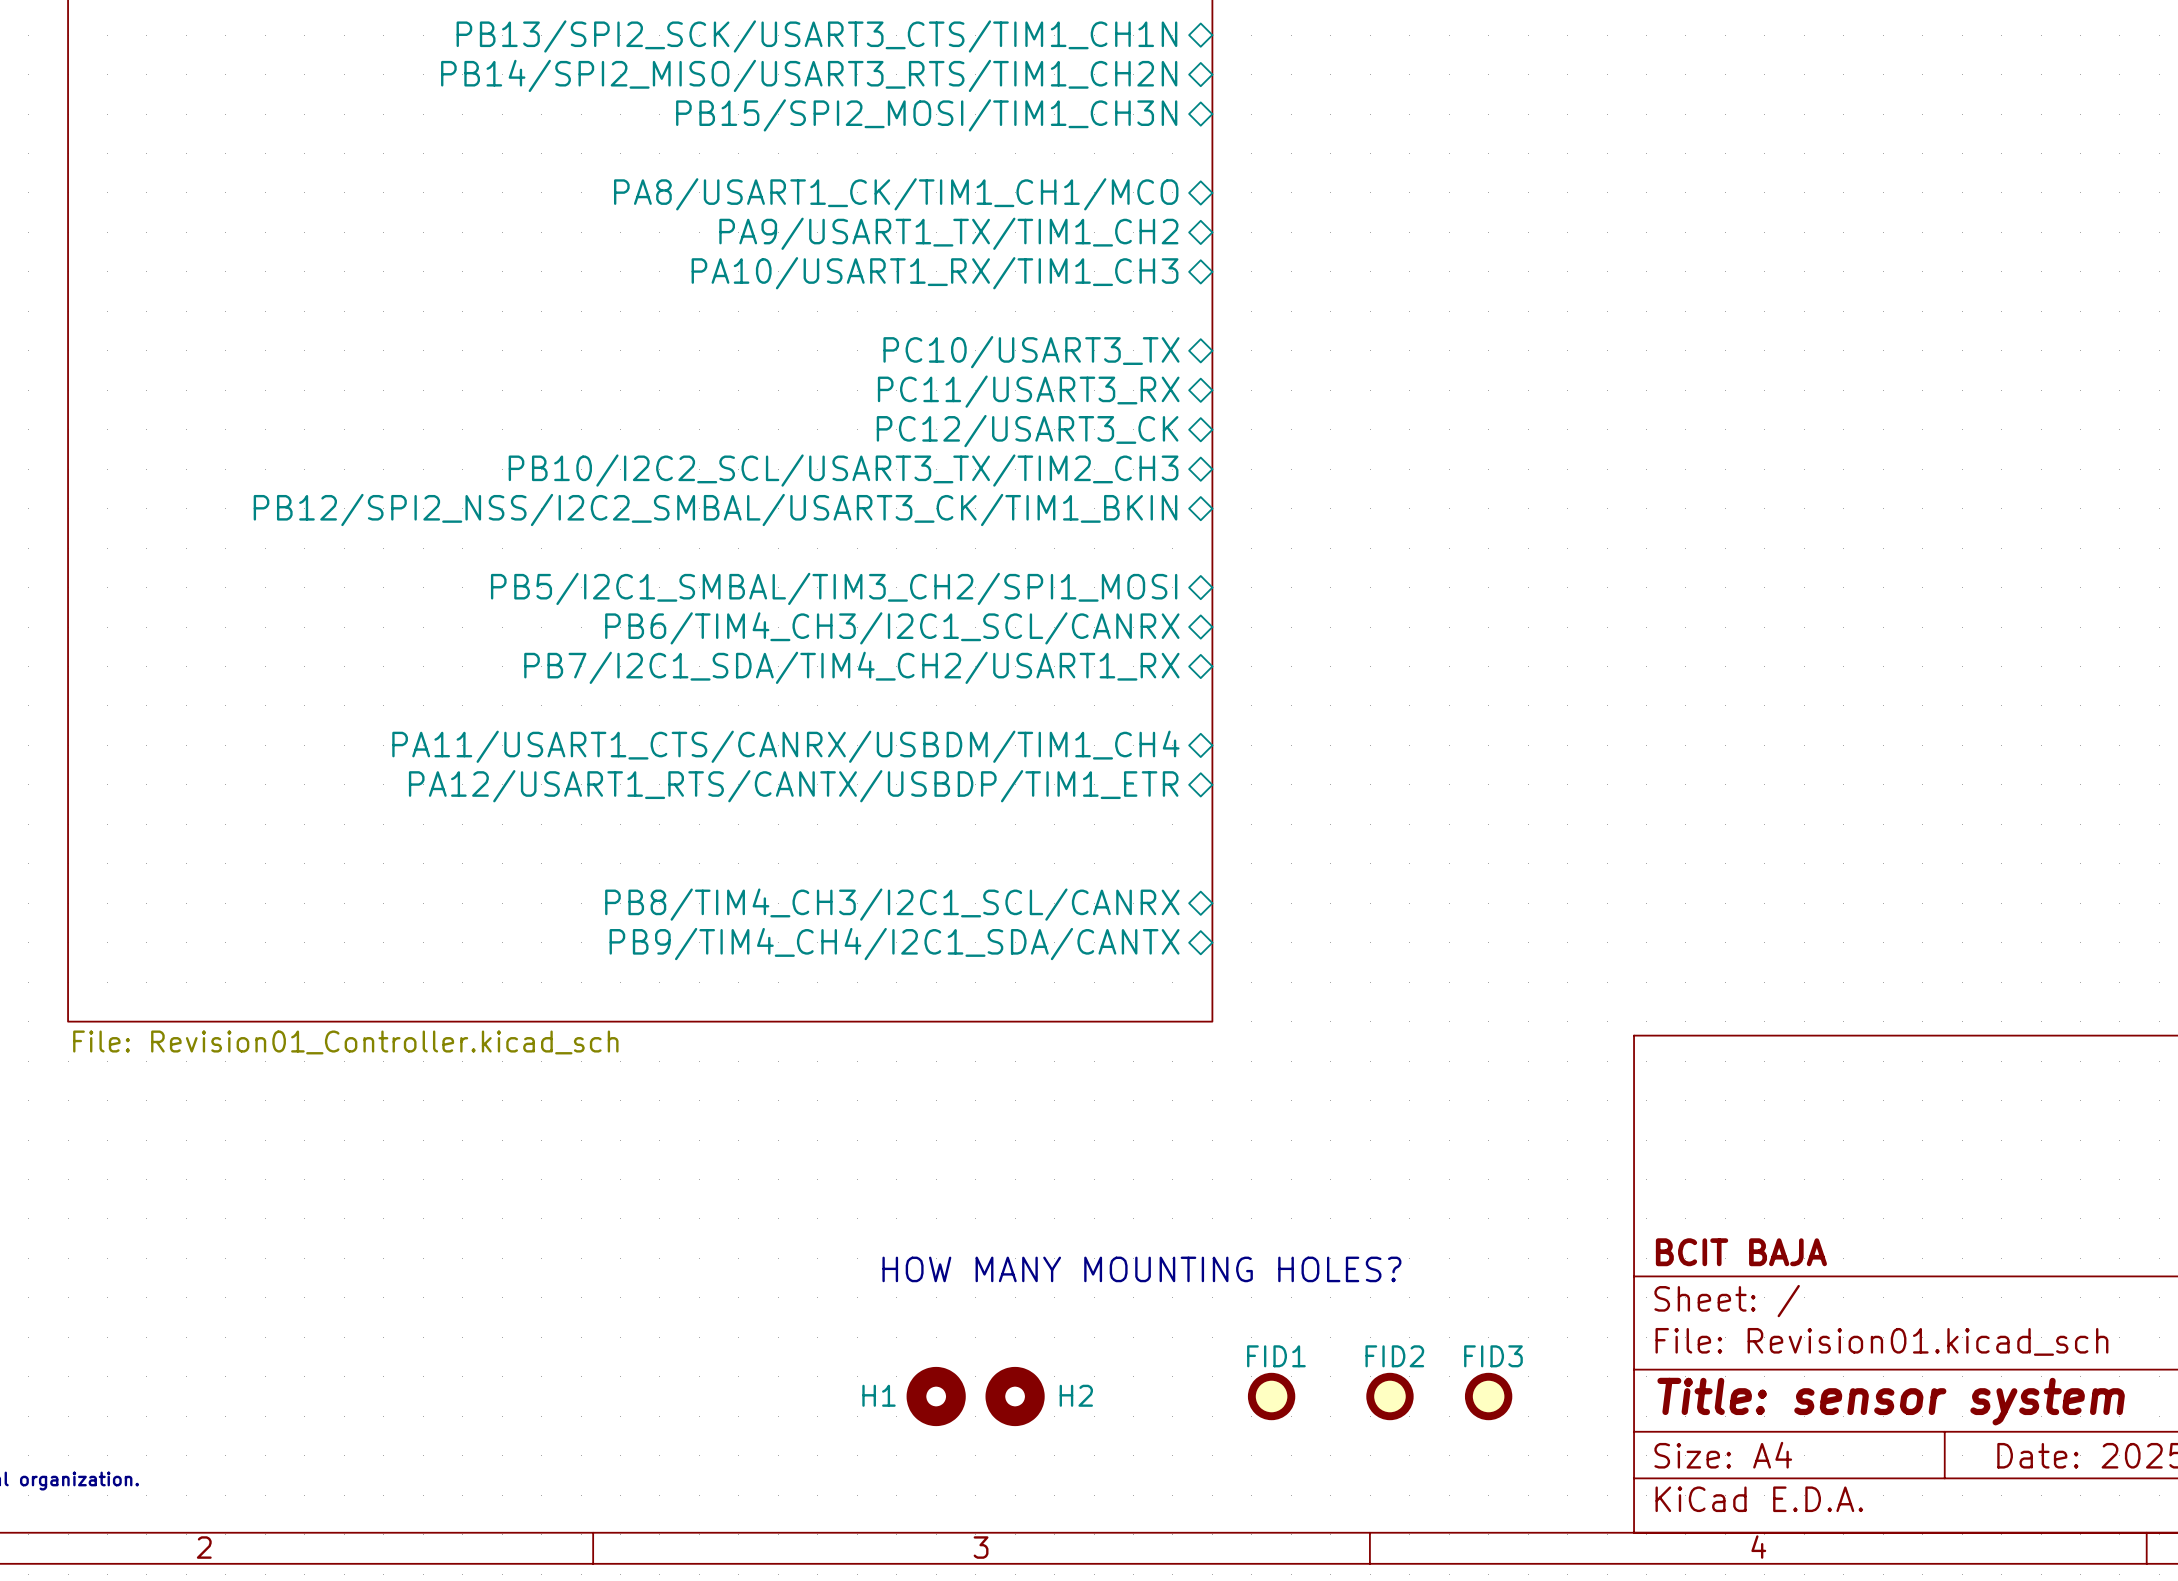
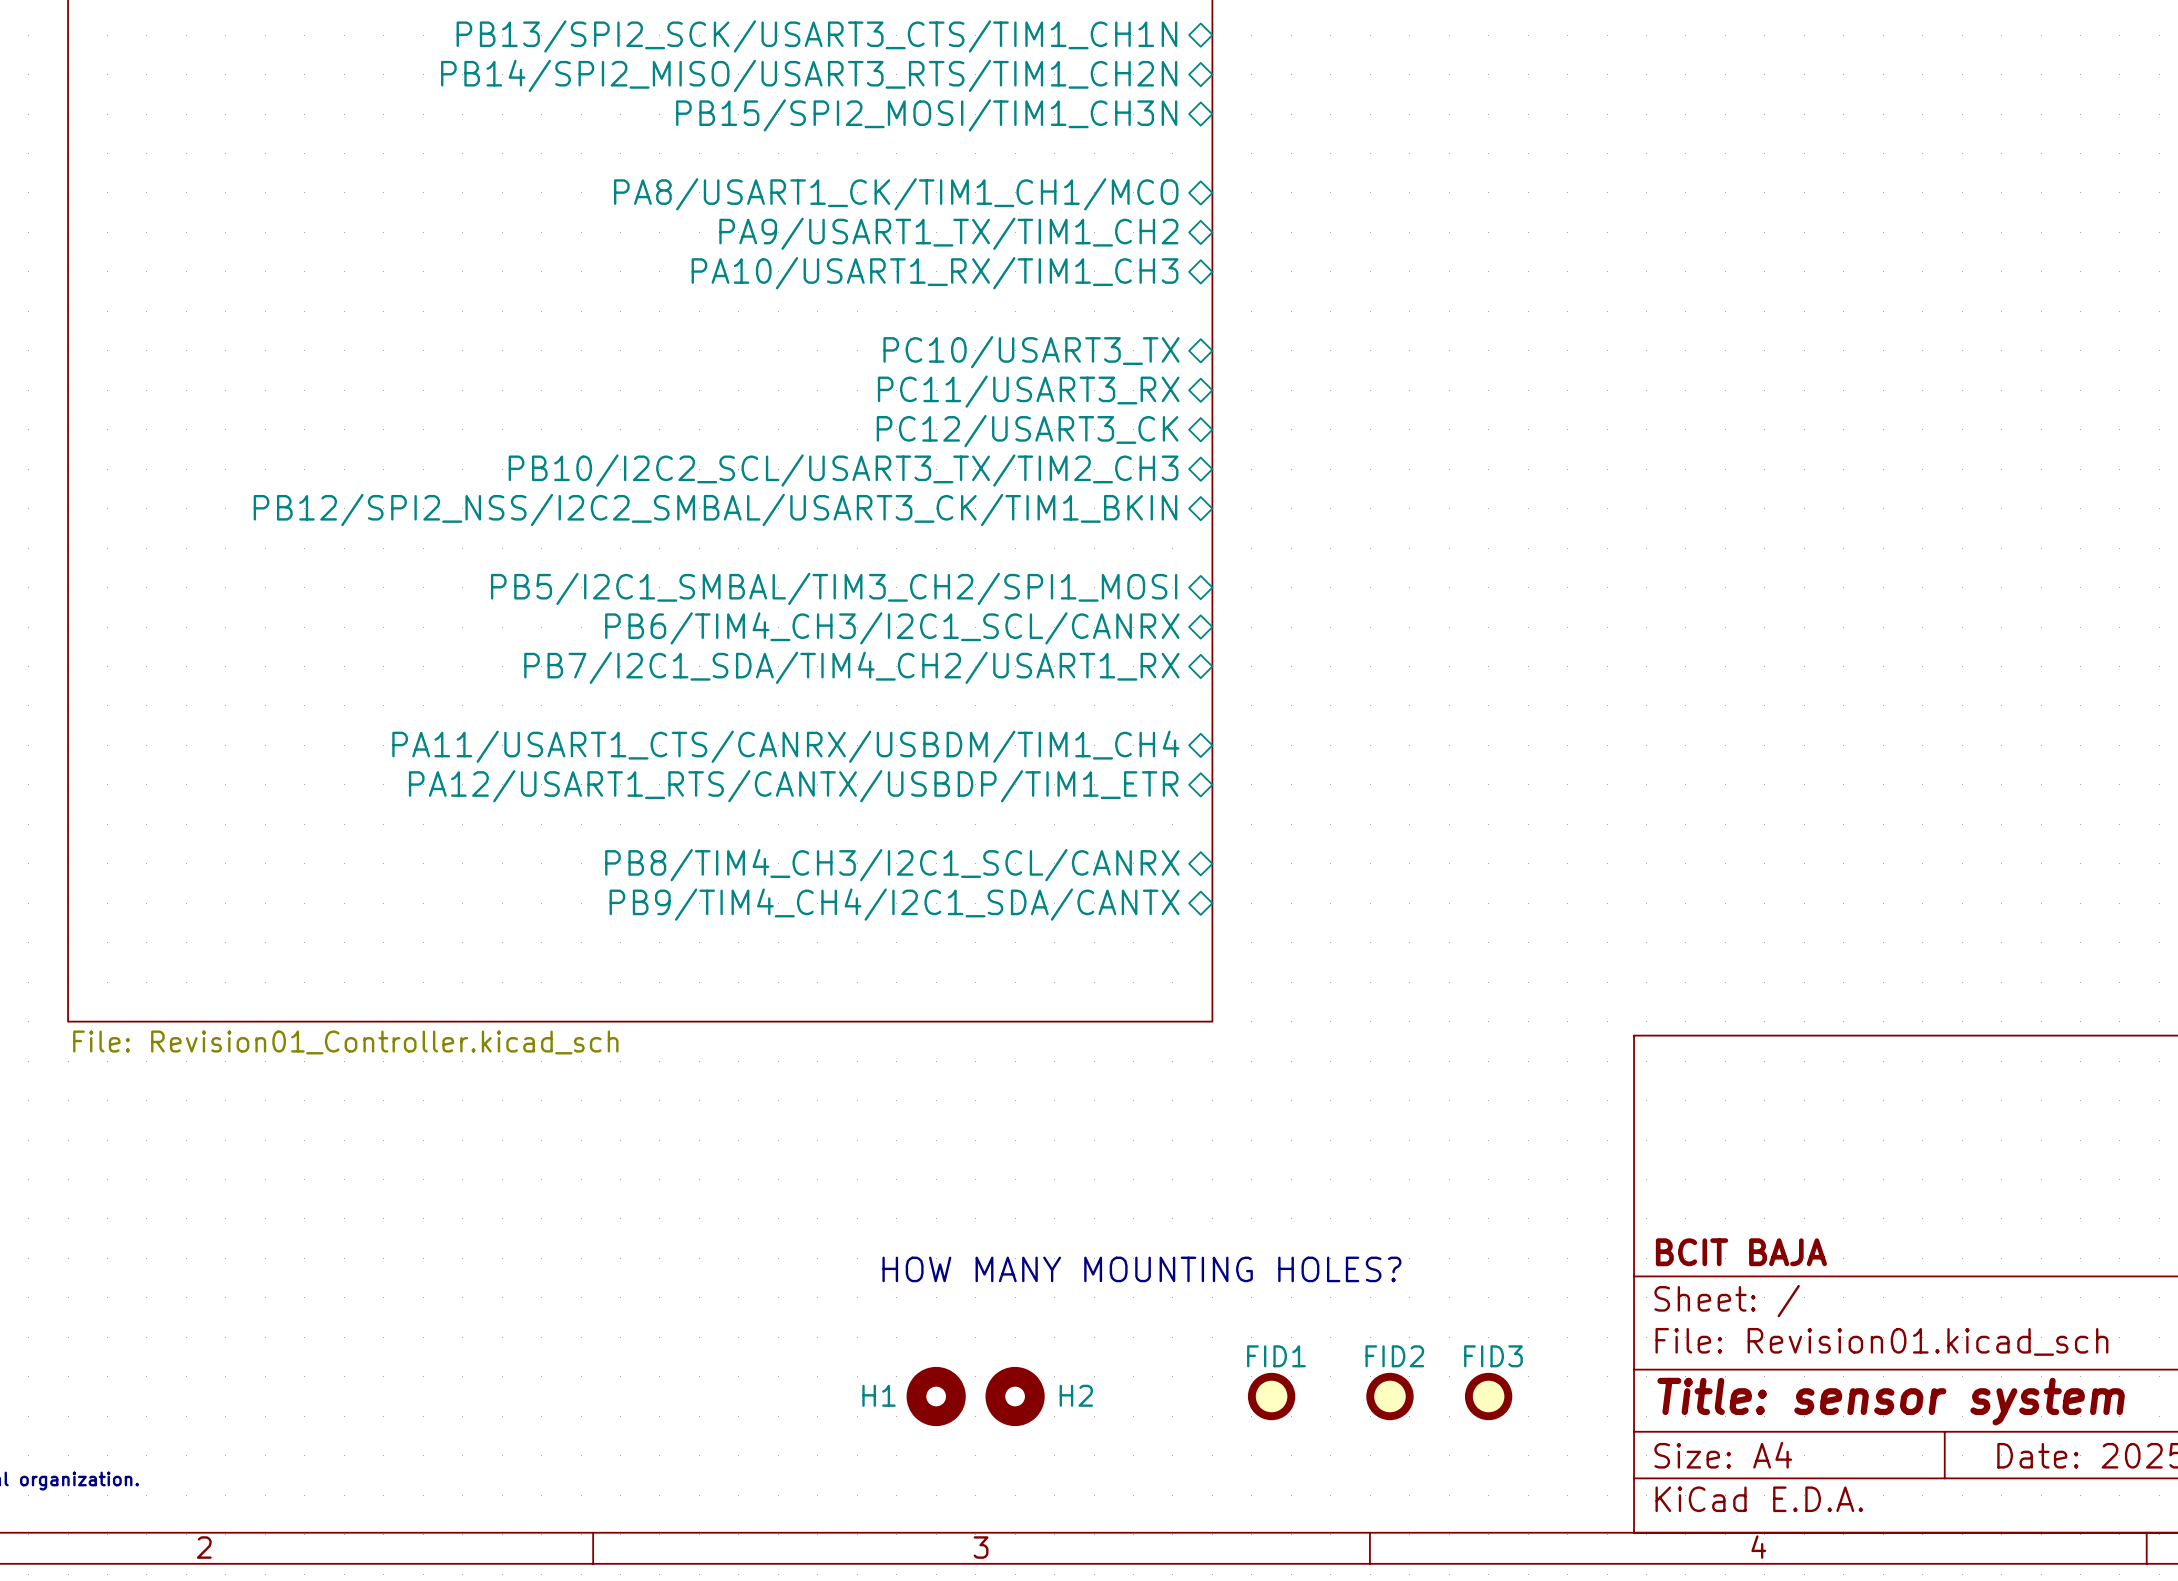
sheet pin: none -> PB8/TIM4_CH3/I2C1_SCL/CANRX (892, 865)
sheet pin: PB8/TIM4_CH3/I2C1_SCL/CANRX (892, 904) -> PB9/TIM4_CH4/I2C1_SDA/CANTX (894, 904)
sheet pin: PB9/TIM4_CH4/I2C1_SDA/CANTX (894, 944) -> none

